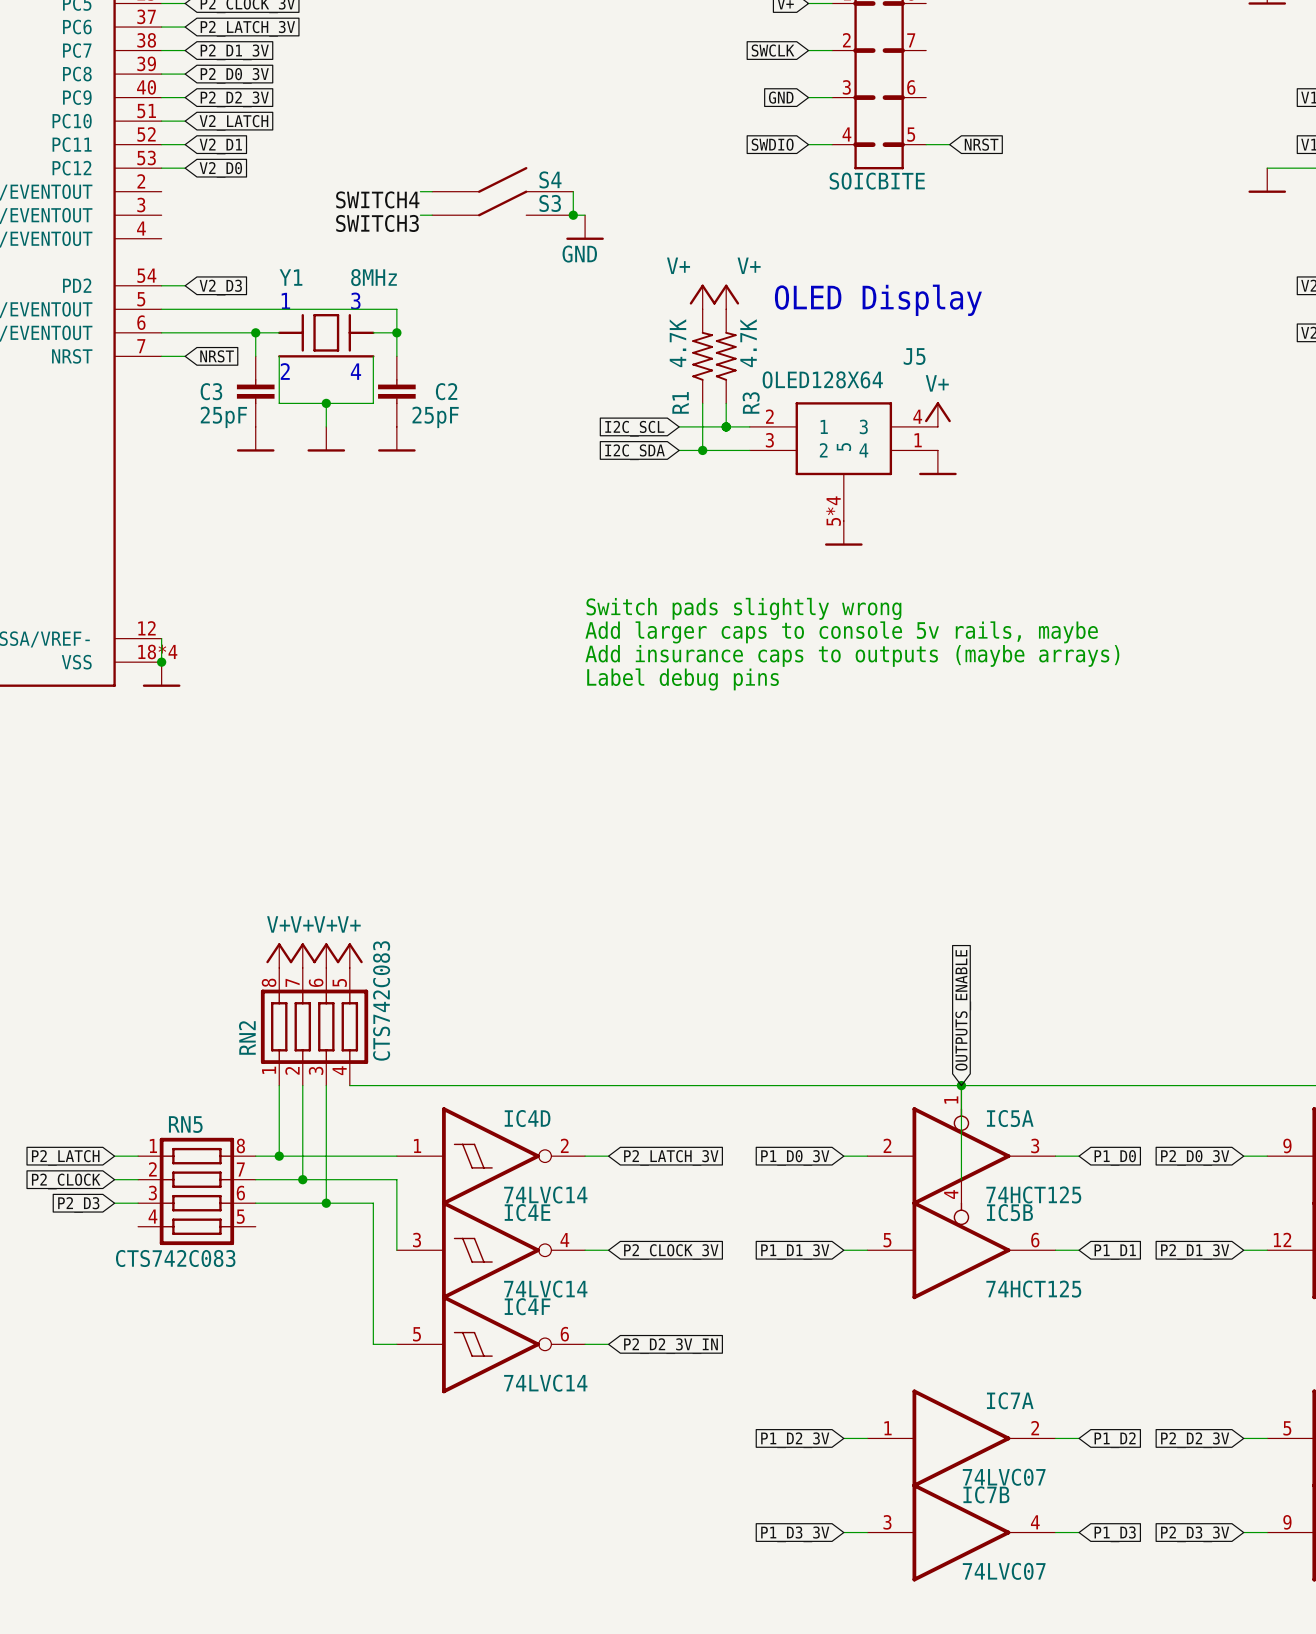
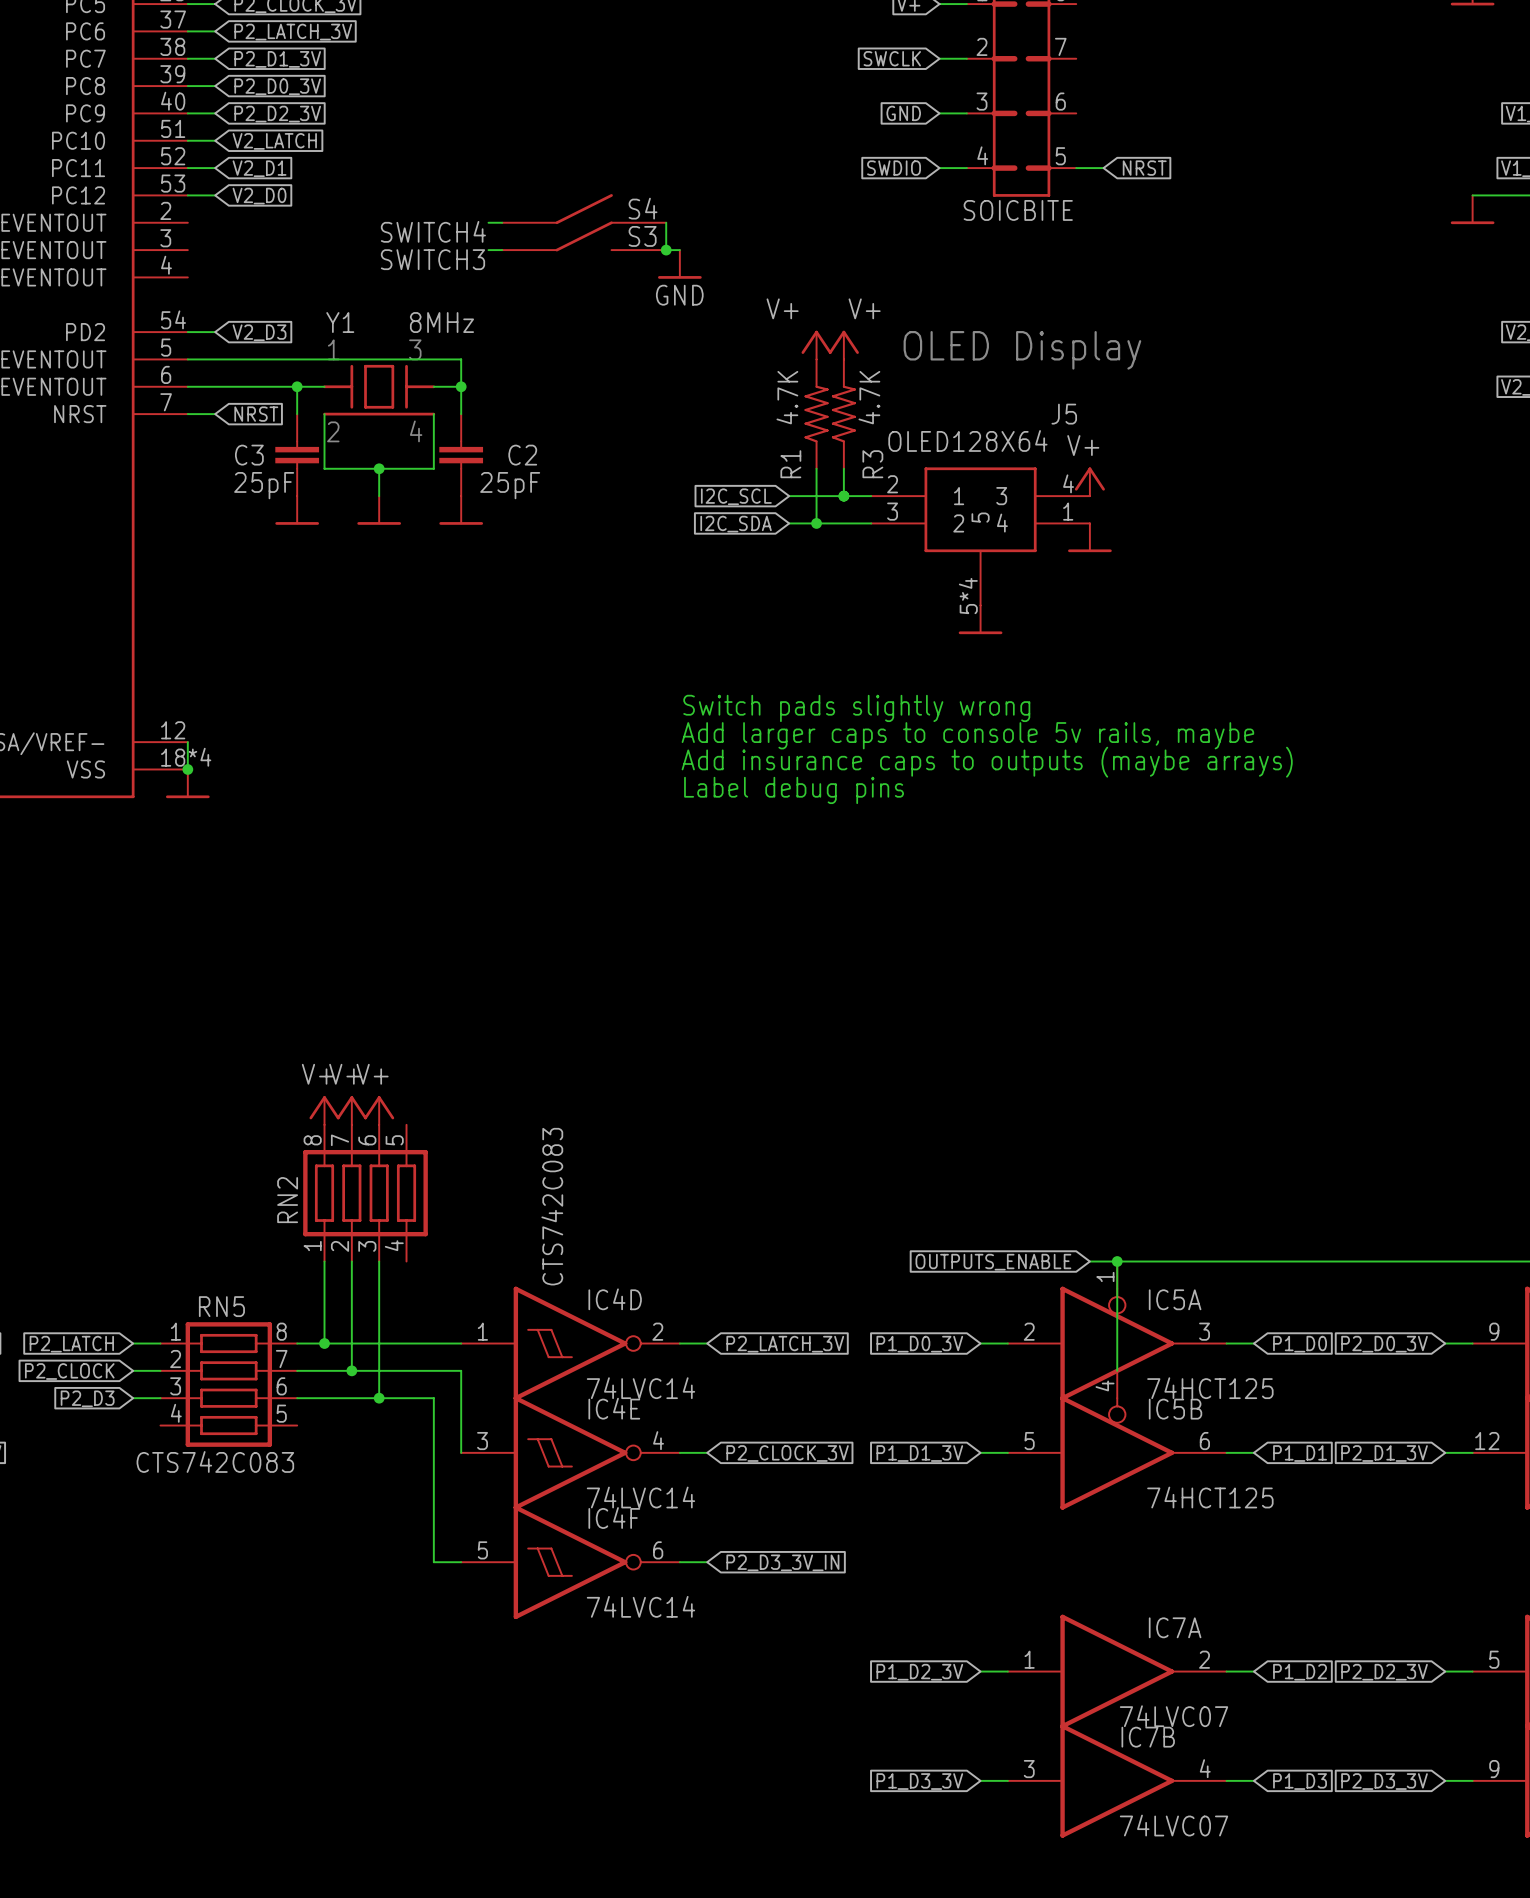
power symbol: V+ (349, 955) -> none
RN2 value position: CTS742C083 (381, 1000) -> CTS742C083 (552, 1206)
global label rotation: 0° (963, 1010) -> 90° counterclockwise (993, 1262)
wire: (349, 1085) (937, 1085) -> none
global label: P2_D2_3V_IN (670, 1346) -> P2_D3_3V_IN (782, 1562)

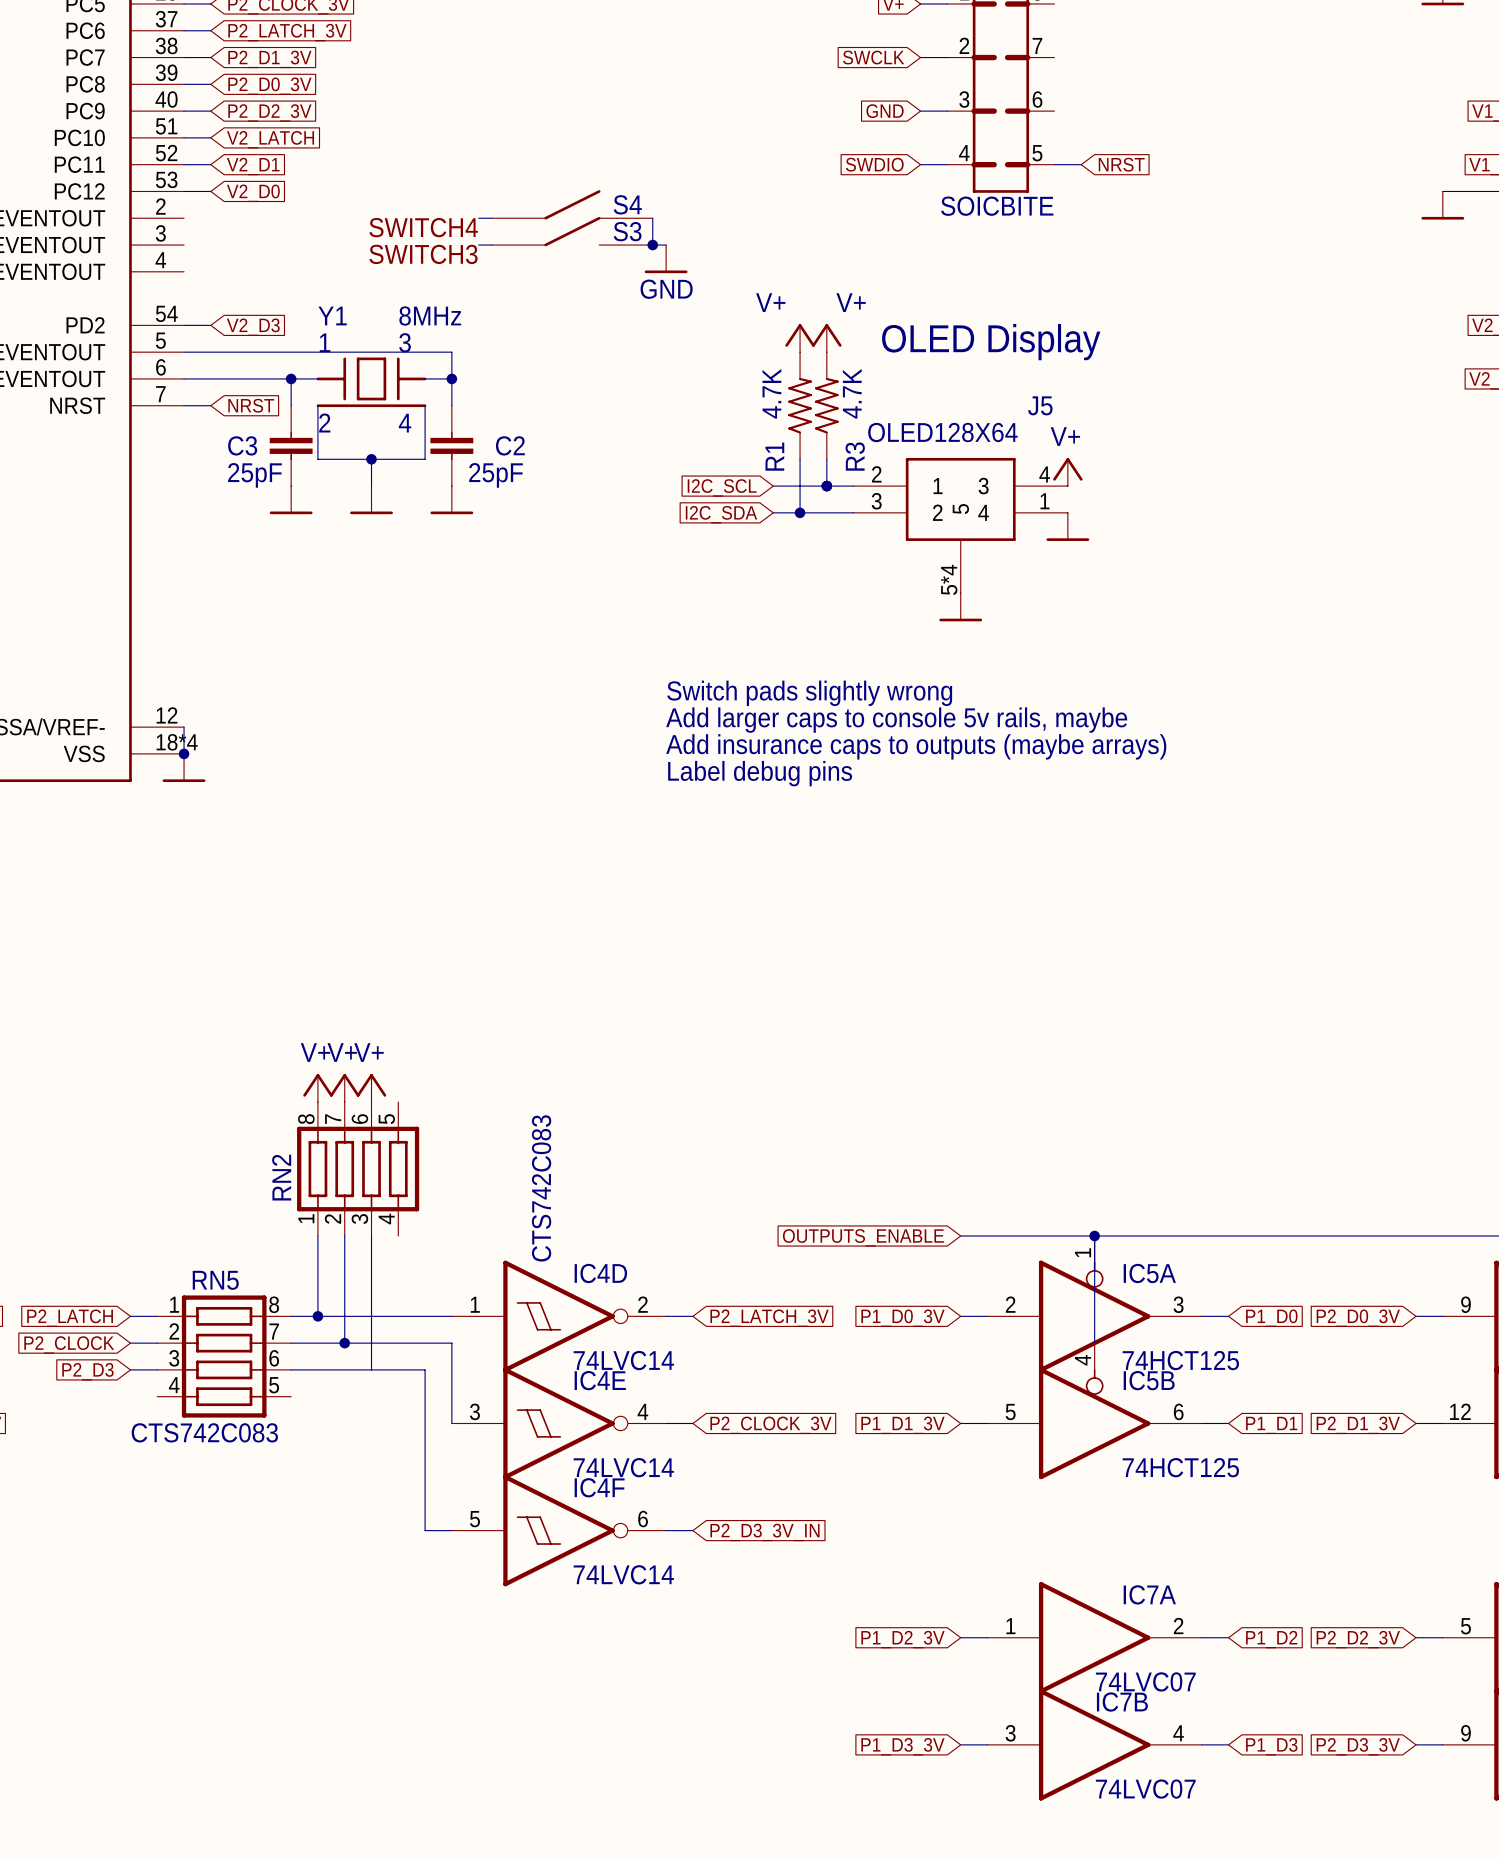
wire: none -> (960, 1236) (1067, 1236)
global label position: OUTPUTS_ENABLE (993, 1262) -> OUTPUTS_ENABLE (863, 1237)
junction: (379, 1398) -> none

